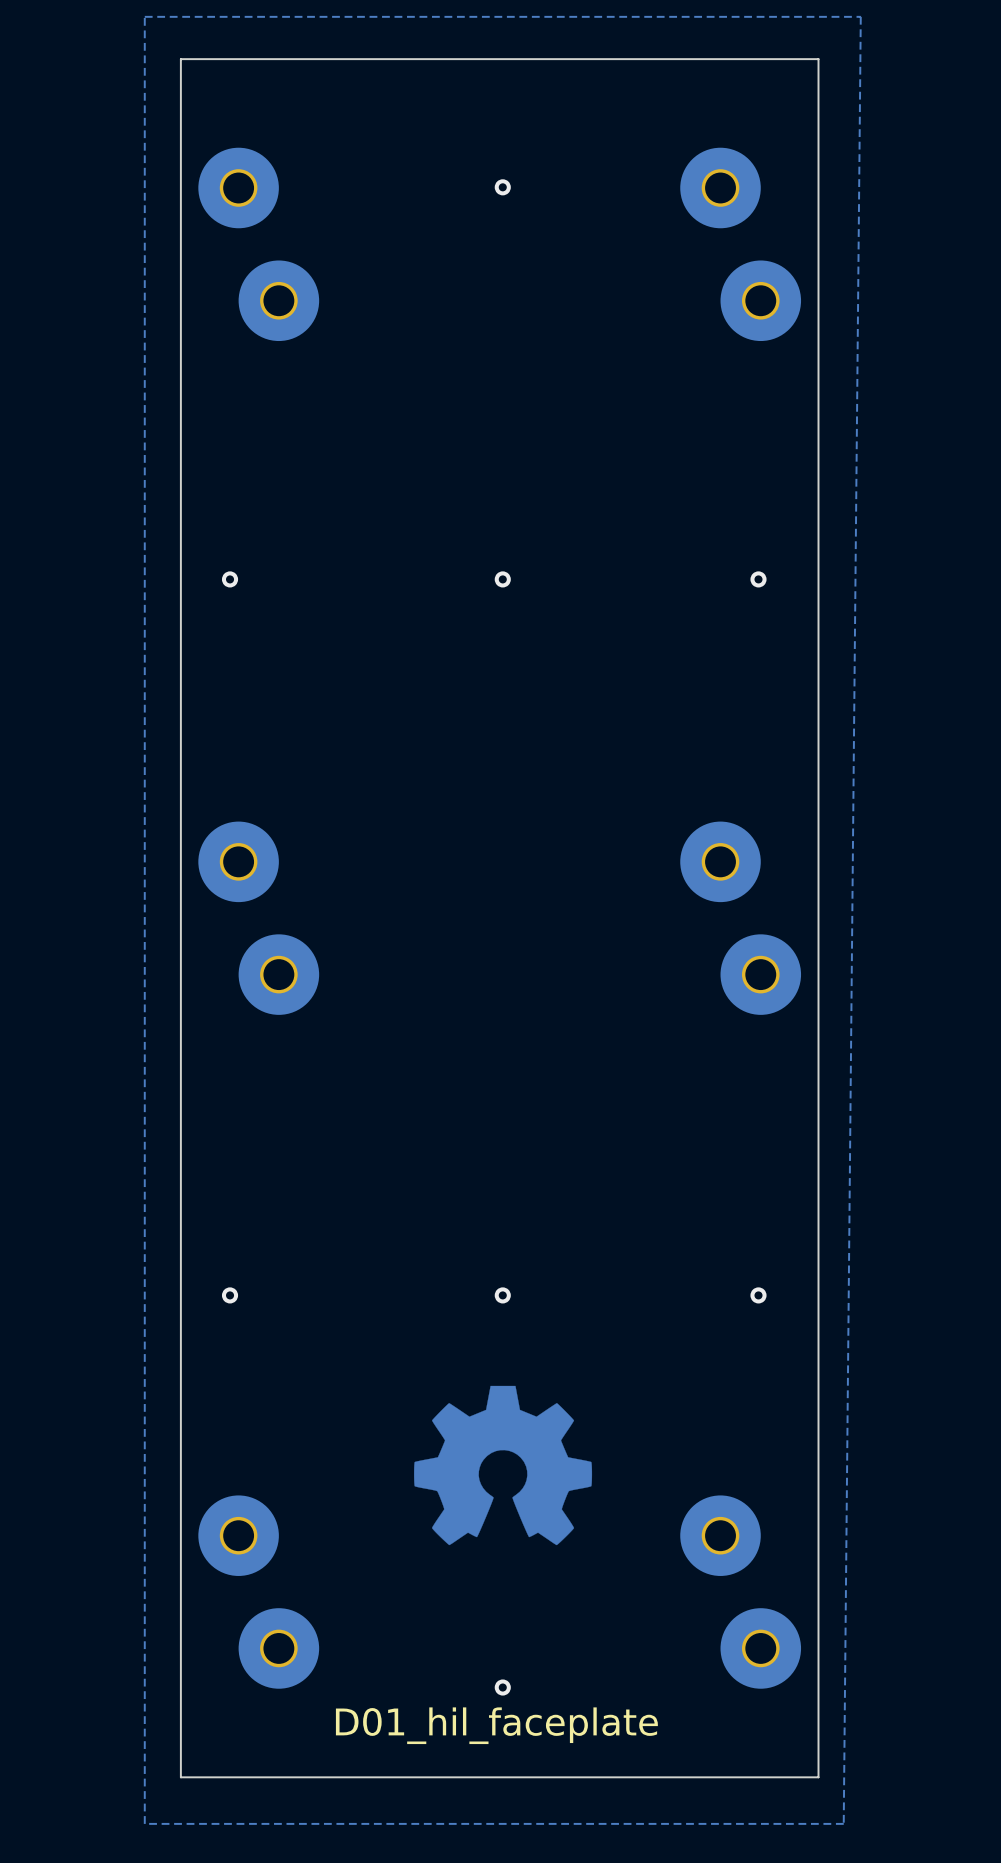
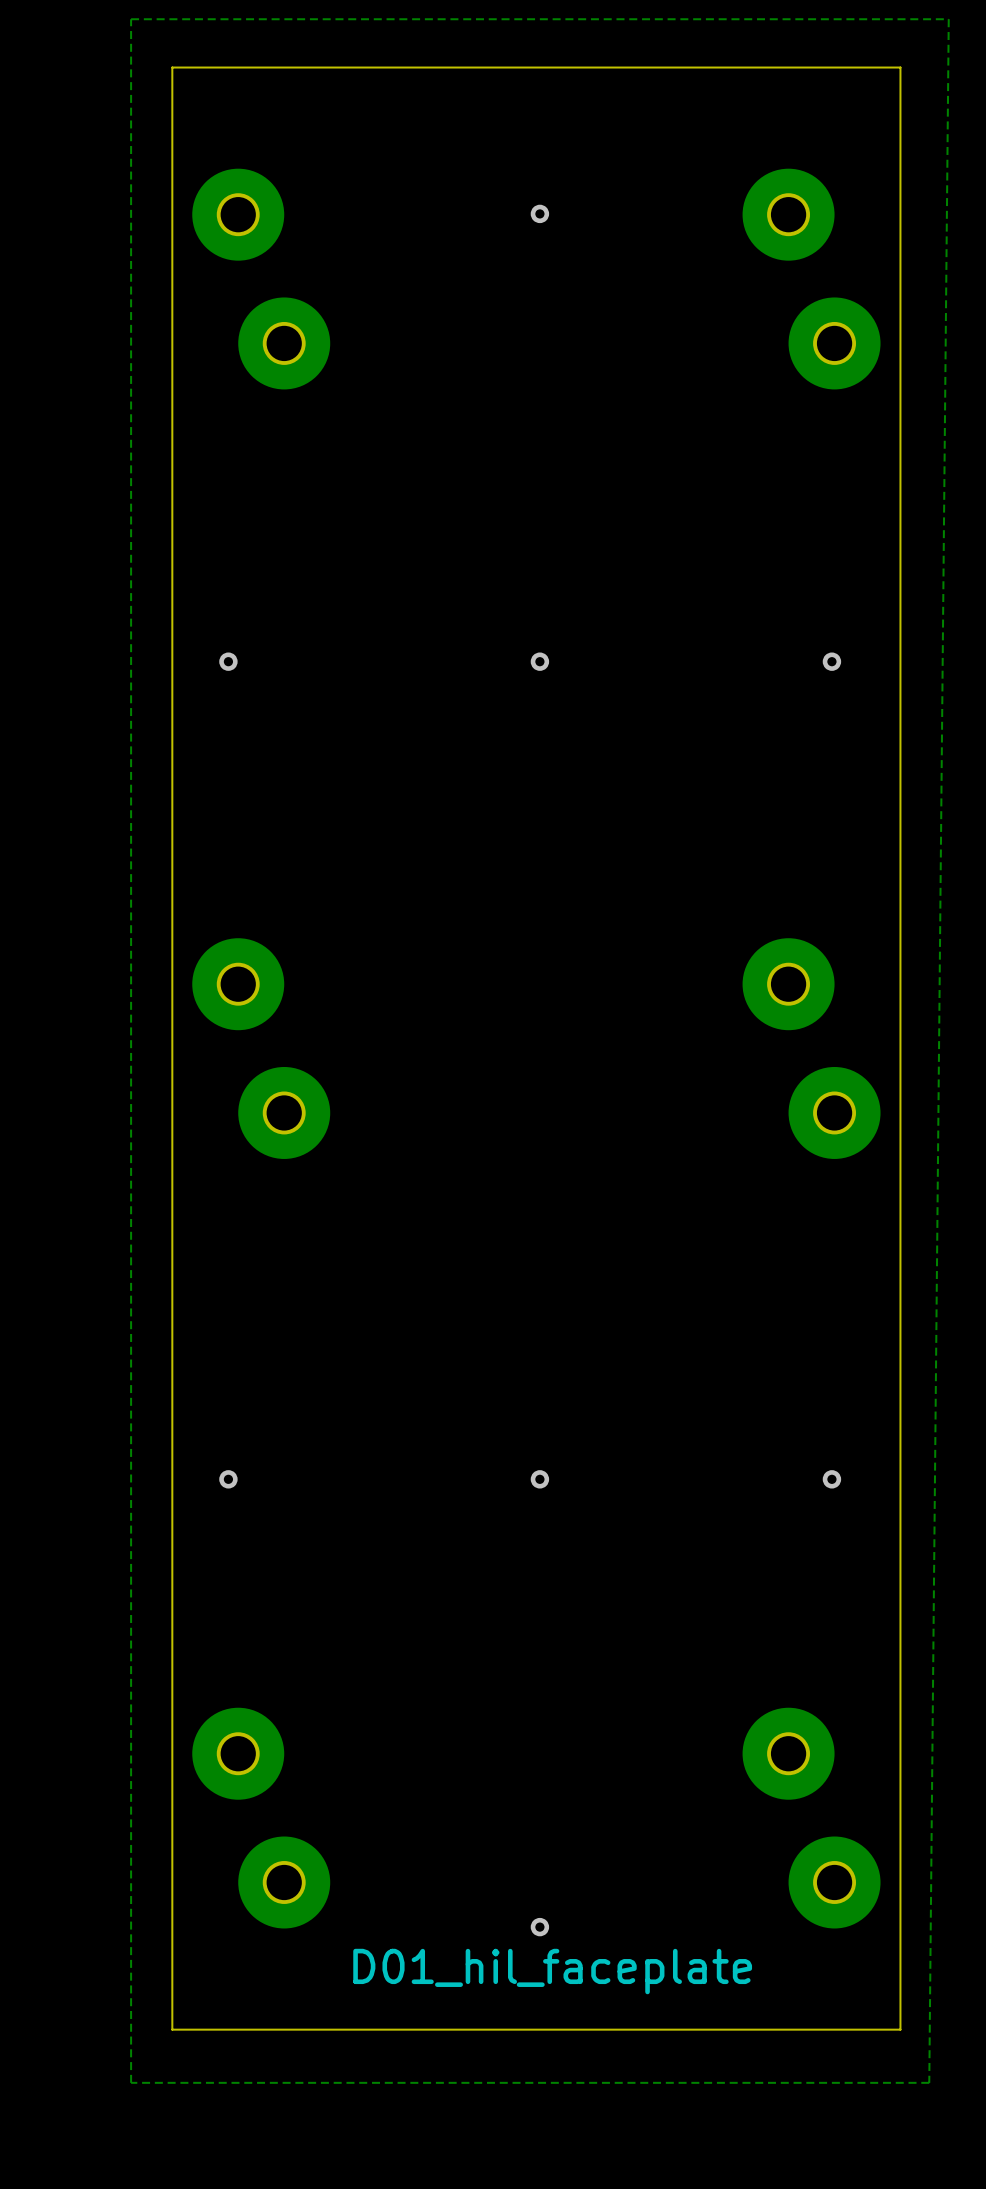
drawing: [414, 1385, 593, 1546] -> none

